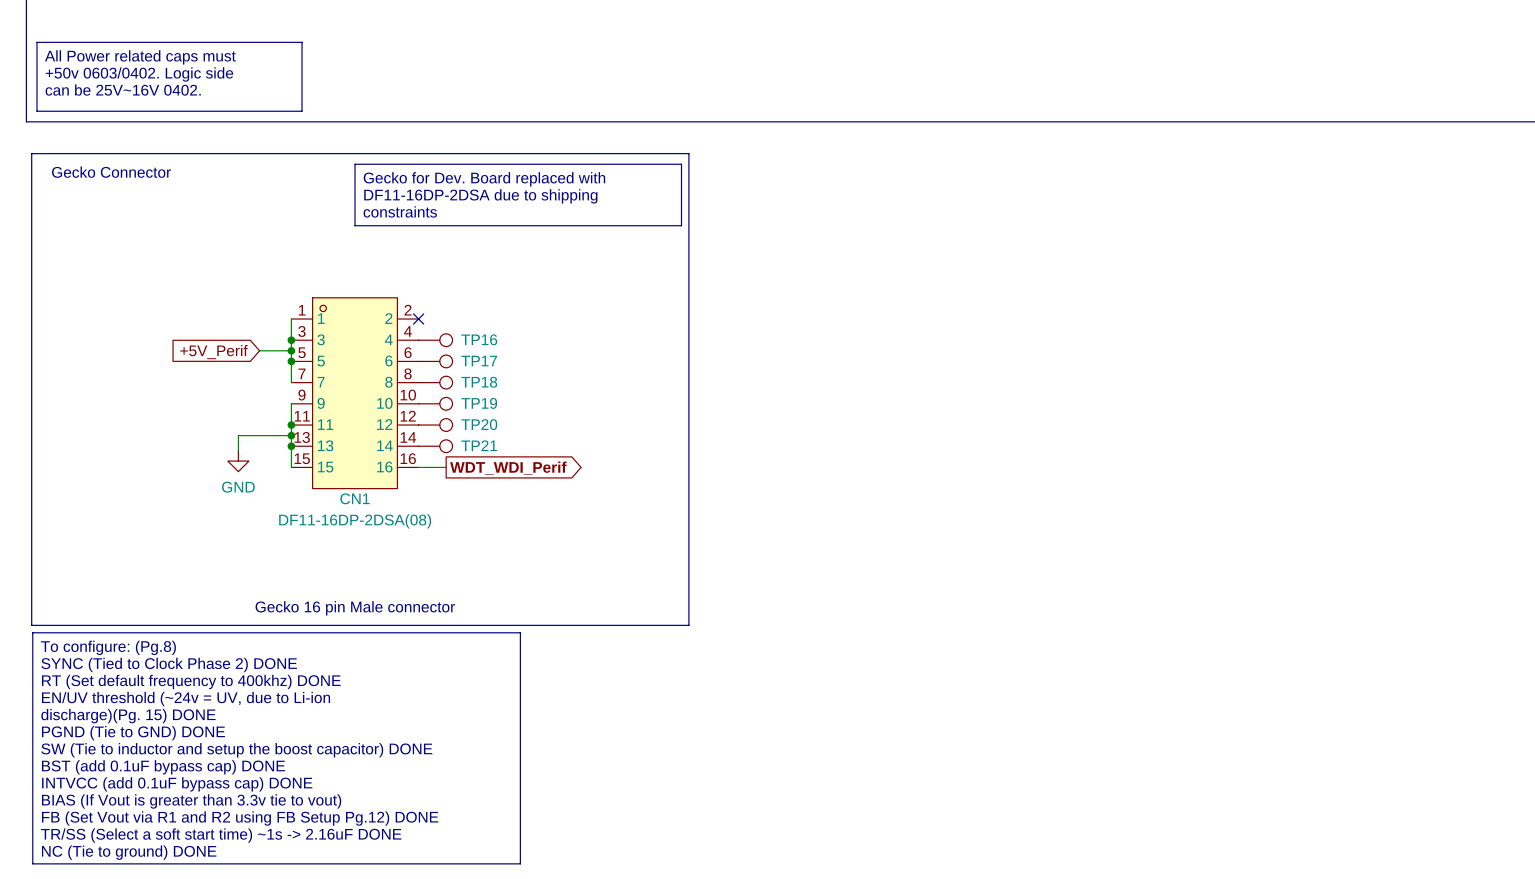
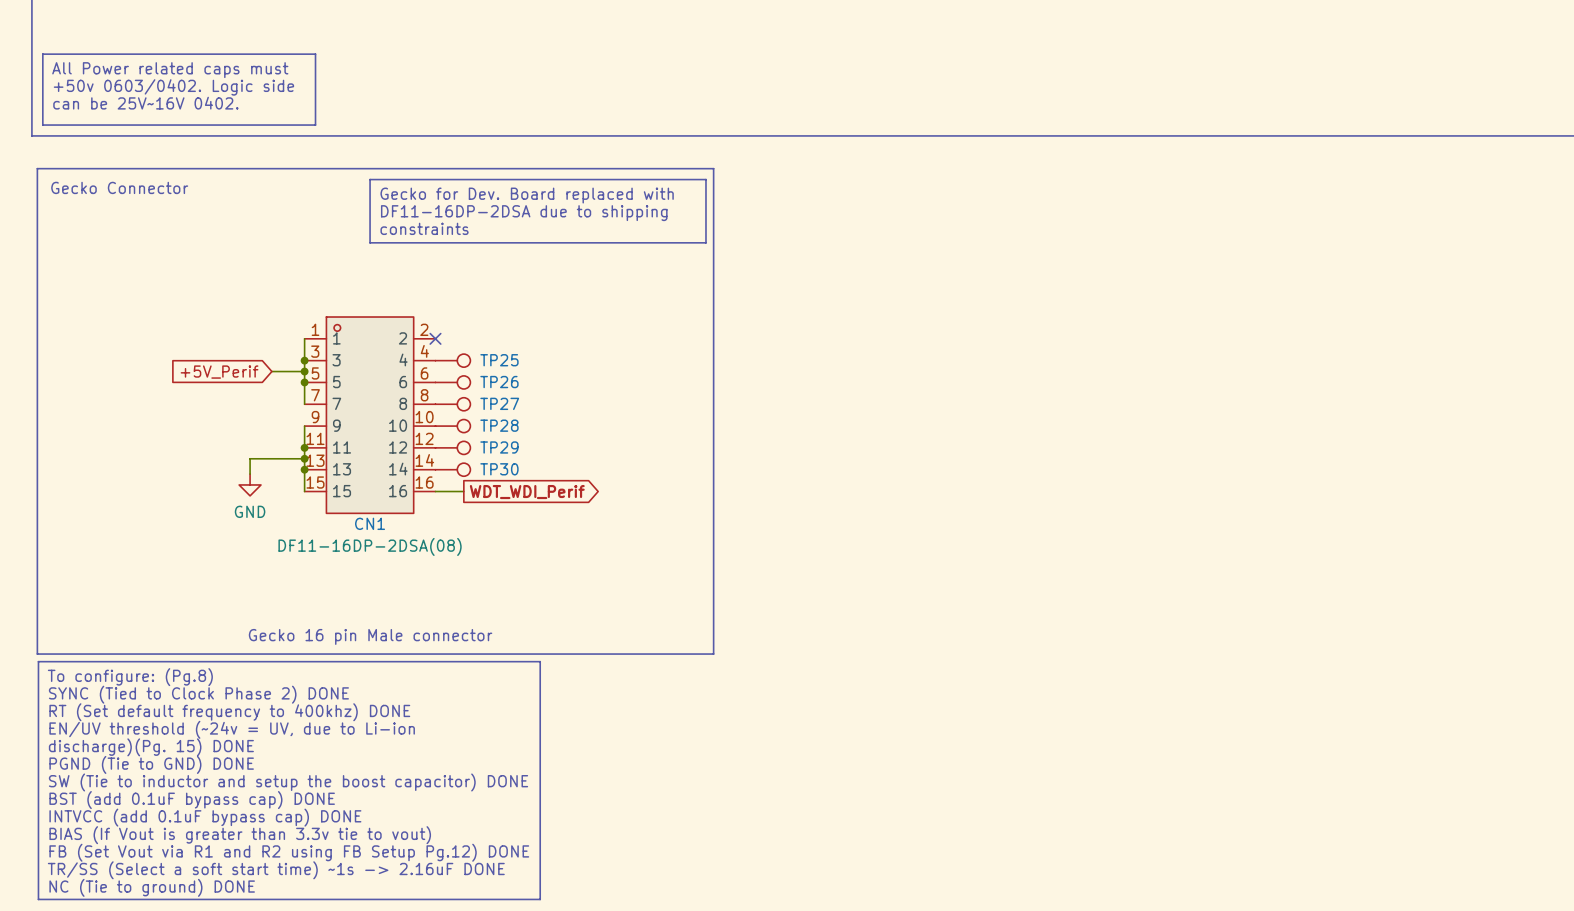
TP16 name: TP16 (479, 339) -> TP25 (499, 360)
TP17 name: TP17 (479, 361) -> TP26 (499, 382)
TP18 name: TP18 (479, 382) -> TP27 (499, 403)
TP19 name: TP19 (479, 403) -> TP28 (499, 425)
TP20 name: TP20 (479, 424) -> TP29 (499, 447)
TP21 name: TP21 (479, 445) -> TP30 (499, 469)

